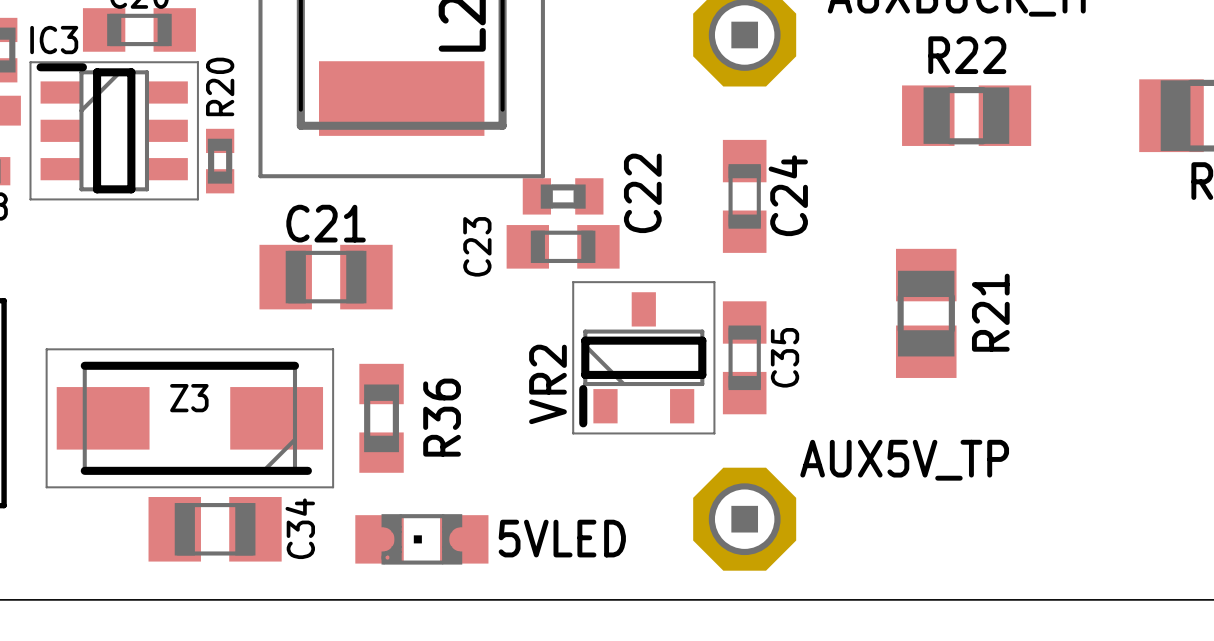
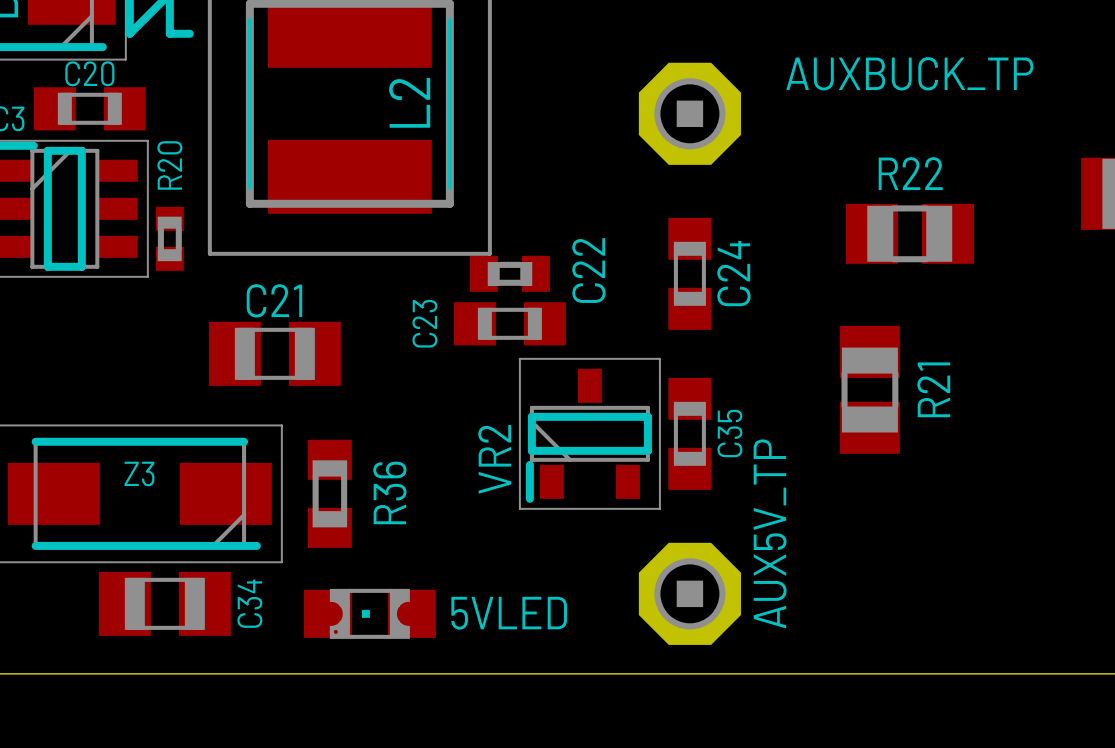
R22 position: (966, 115) -> (909, 233)
AUX5V_TP name rotation: 0° (904, 460) -> 90° counterclockwise (770, 533)

